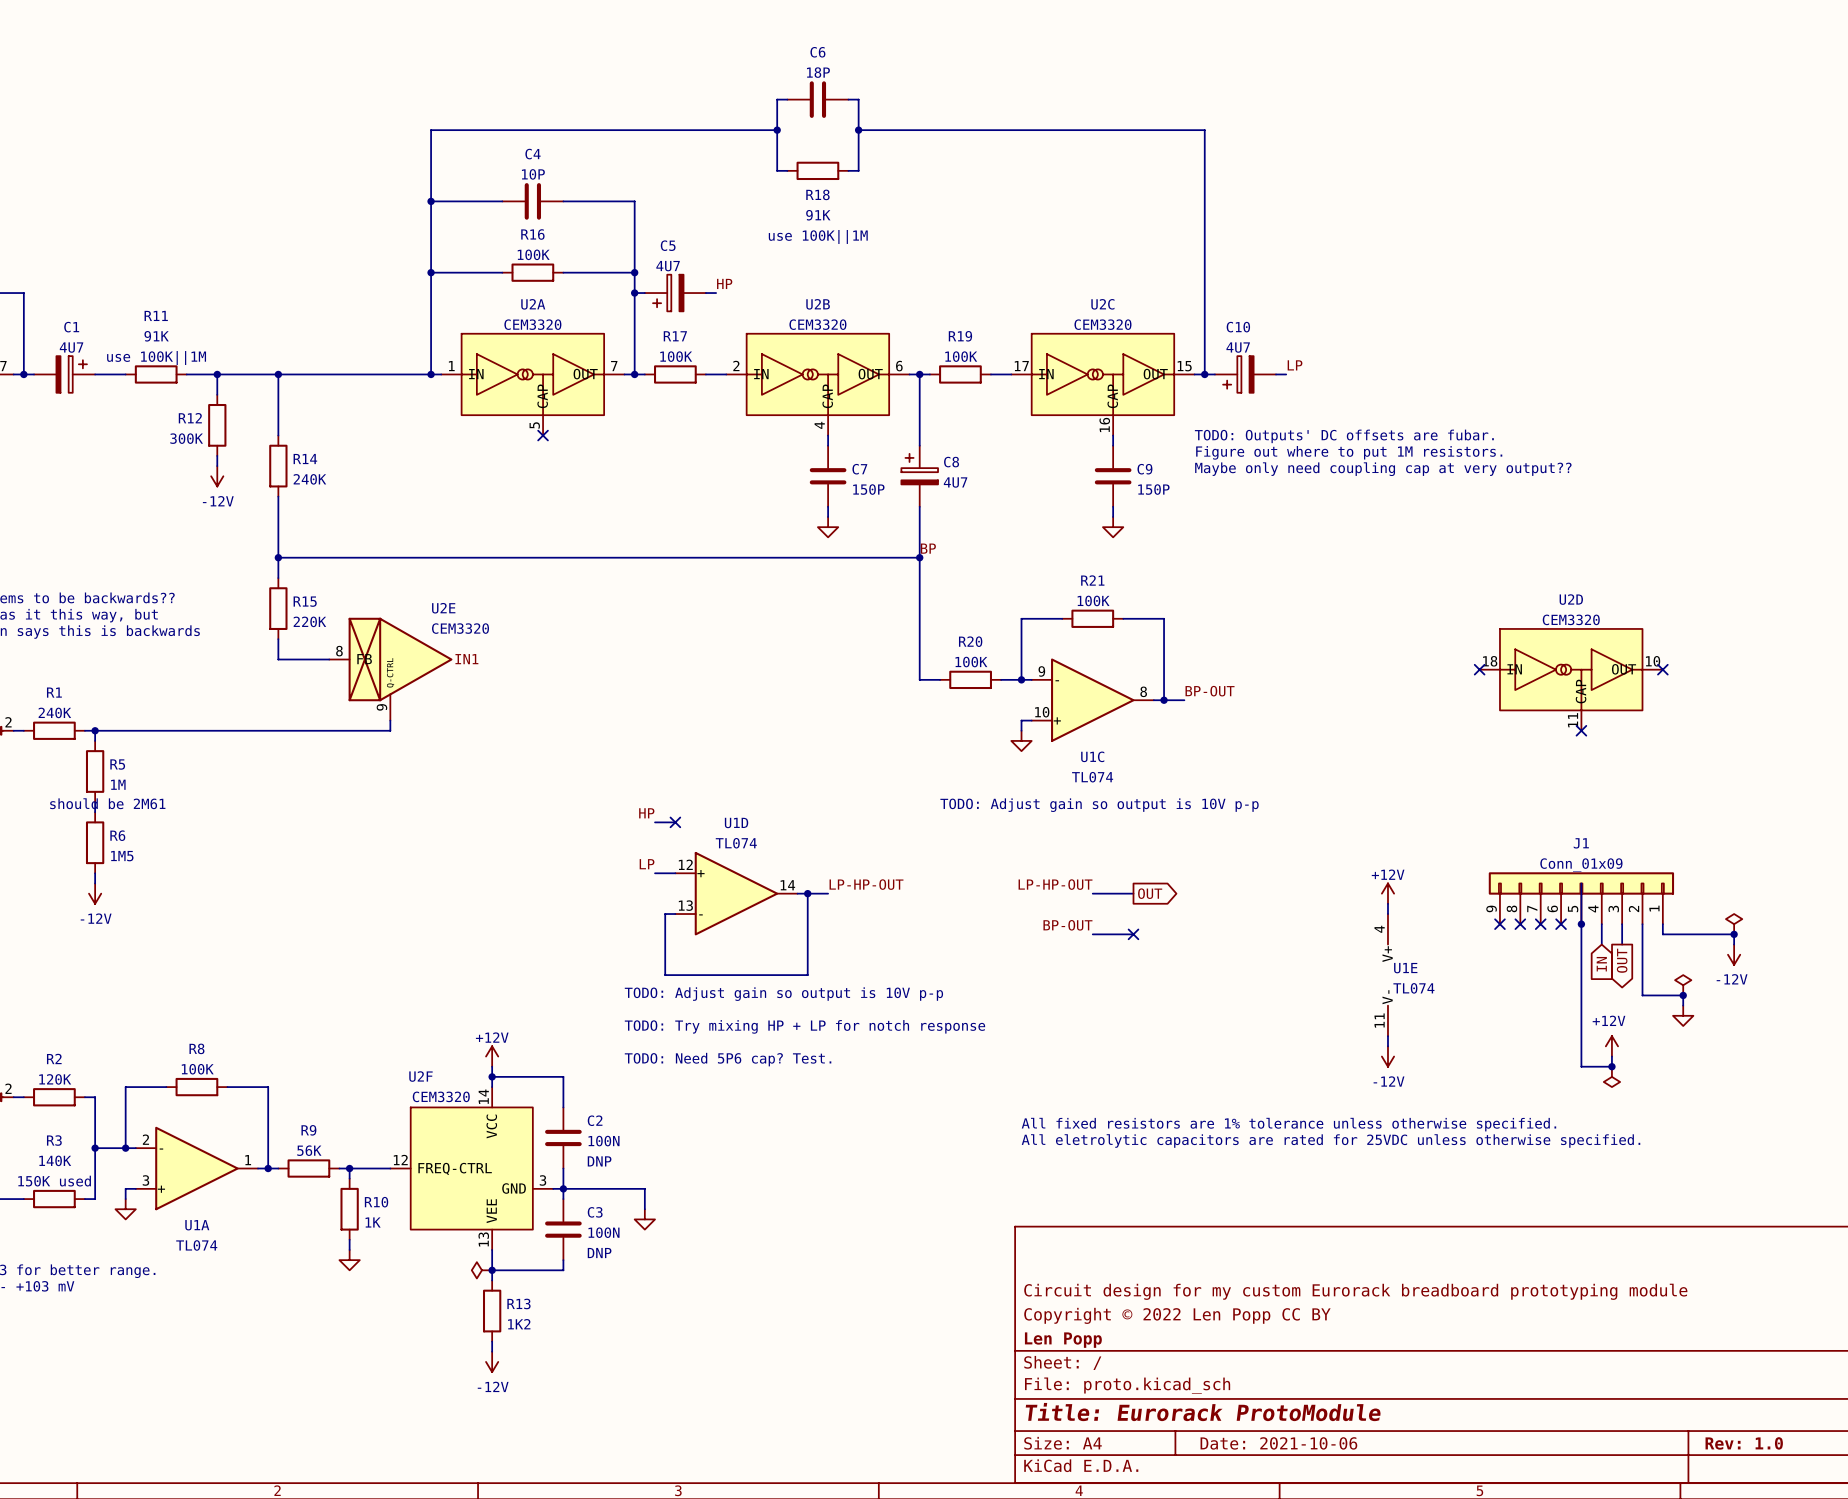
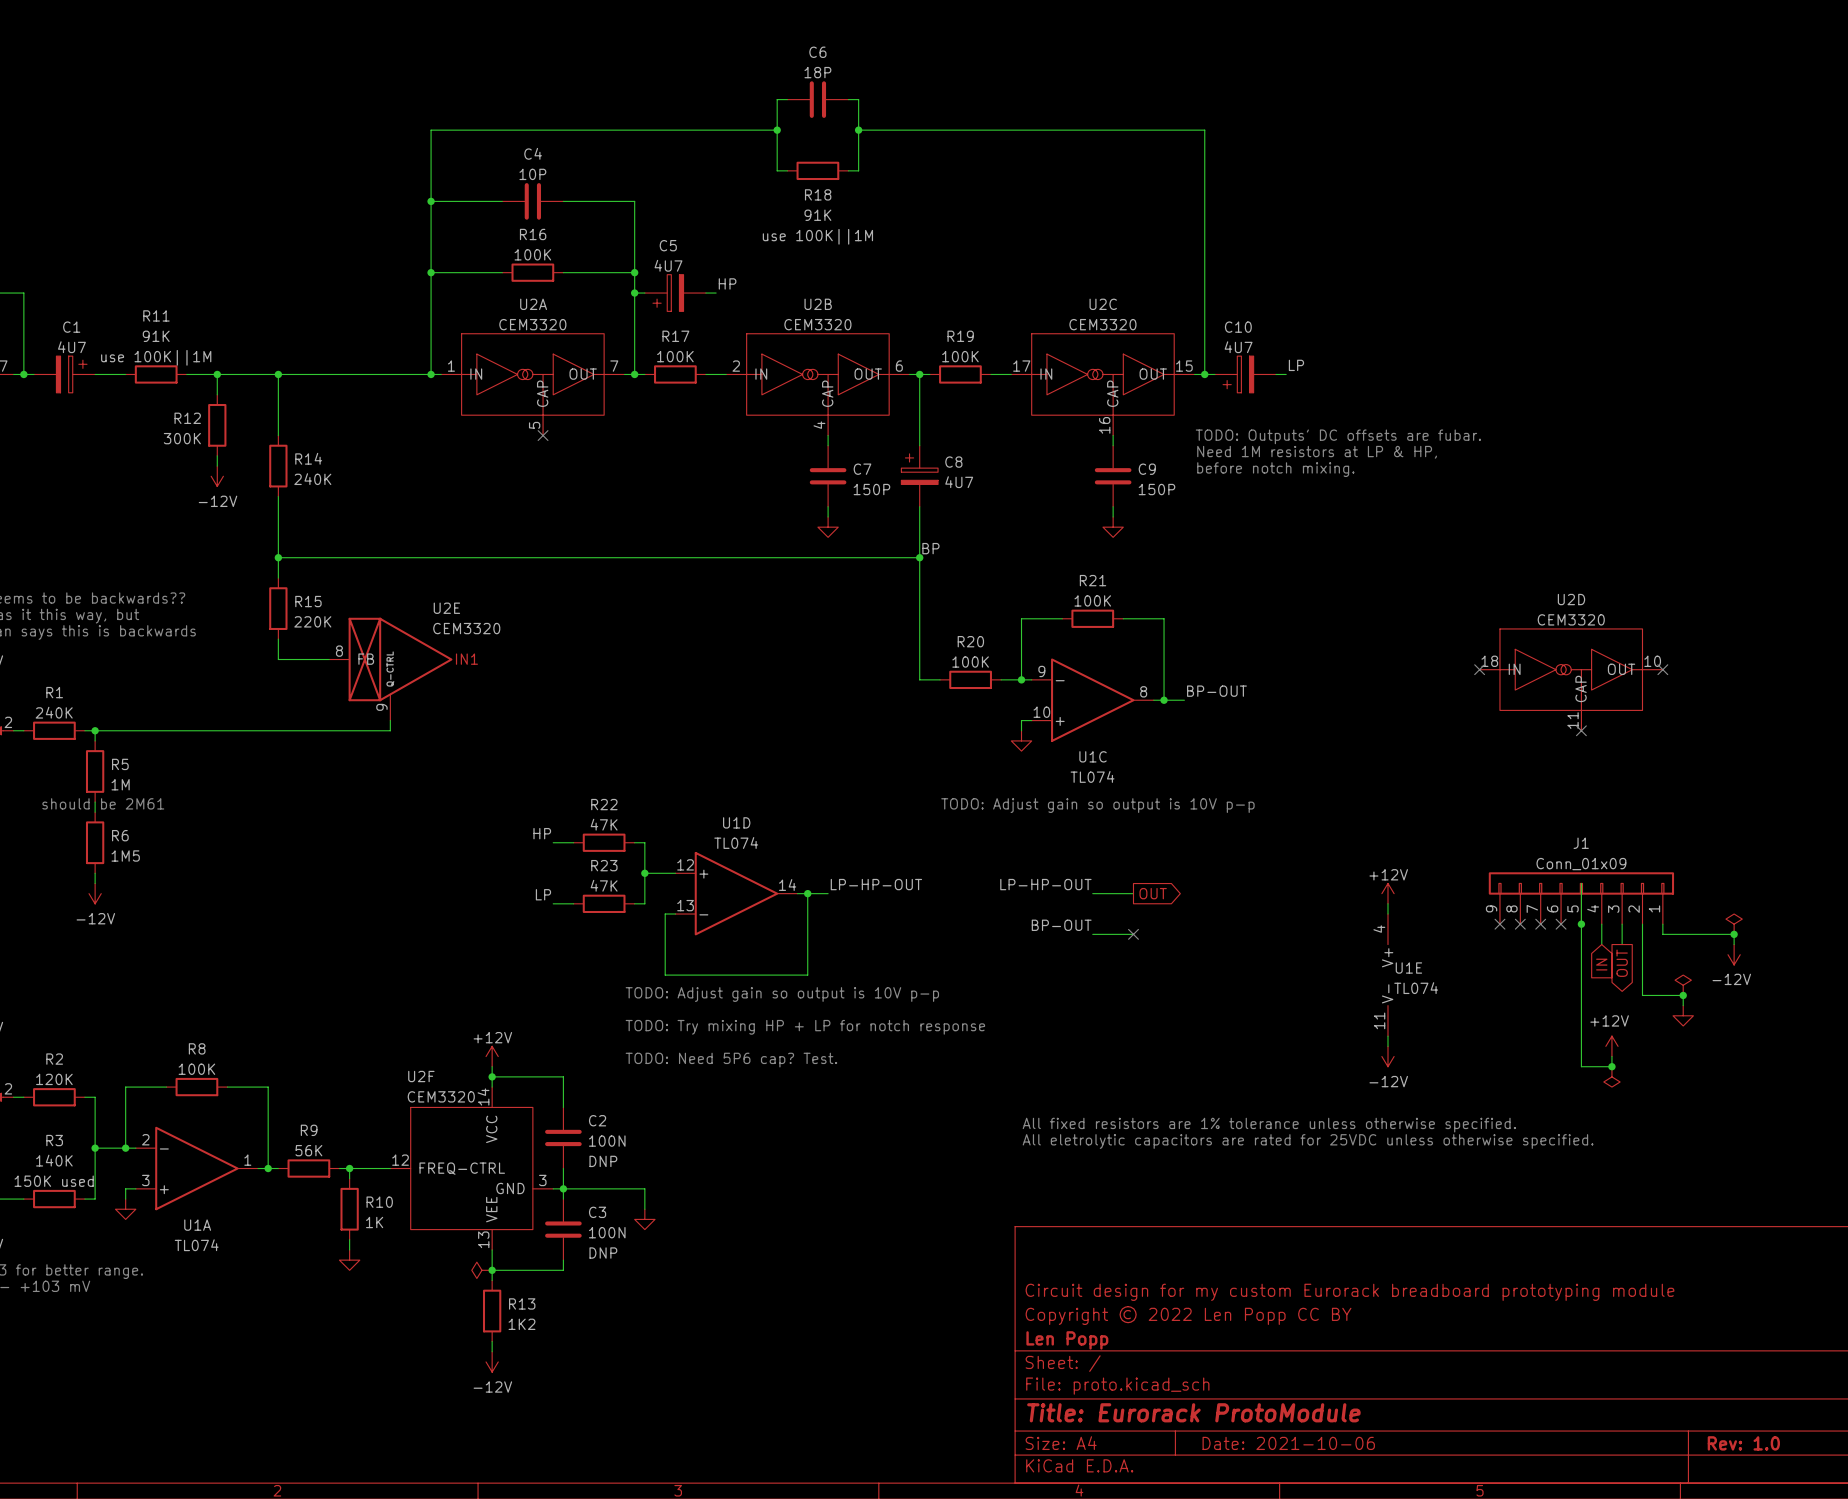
text: Figure out where to put 1M resistors. (1349, 452) -> Need 1M resistors at LP & HP, (1317, 452)
text: Maybe only need coupling cap at very output?? (1383, 469) -> before notch mixing. (1275, 469)
label position: HP (646, 813) -> HP (542, 833)
wire: (655, 822) (675, 822) -> (553, 842) (573, 842)
no-connect mark: (675, 822) -> none
R22: none -> 47K (604, 842)
wire: none -> (634, 842) (644, 842) (644, 903) (634, 903)
label position: LP (647, 864) -> LP (543, 894)
wire: none -> (644, 873) (655, 873)
junction: none -> (644, 873)
wire: none -> (553, 903) (573, 903)
R23: none -> 47K (604, 903)

